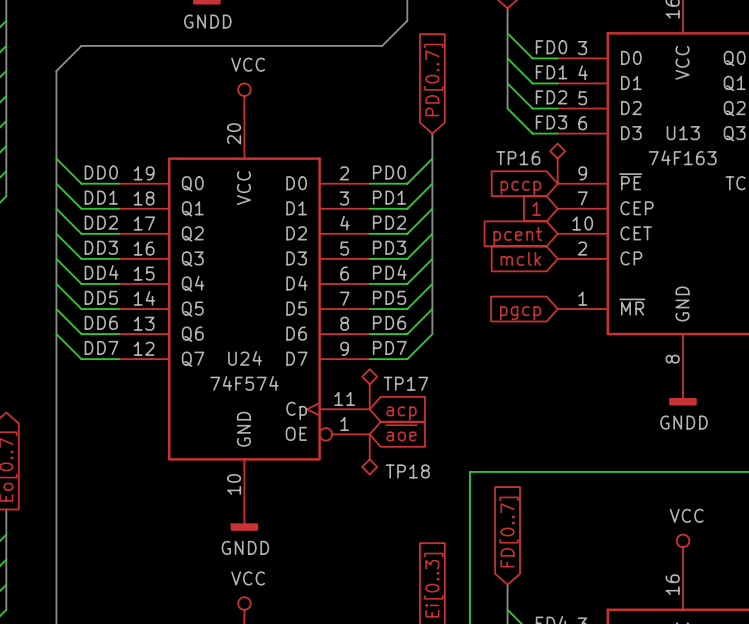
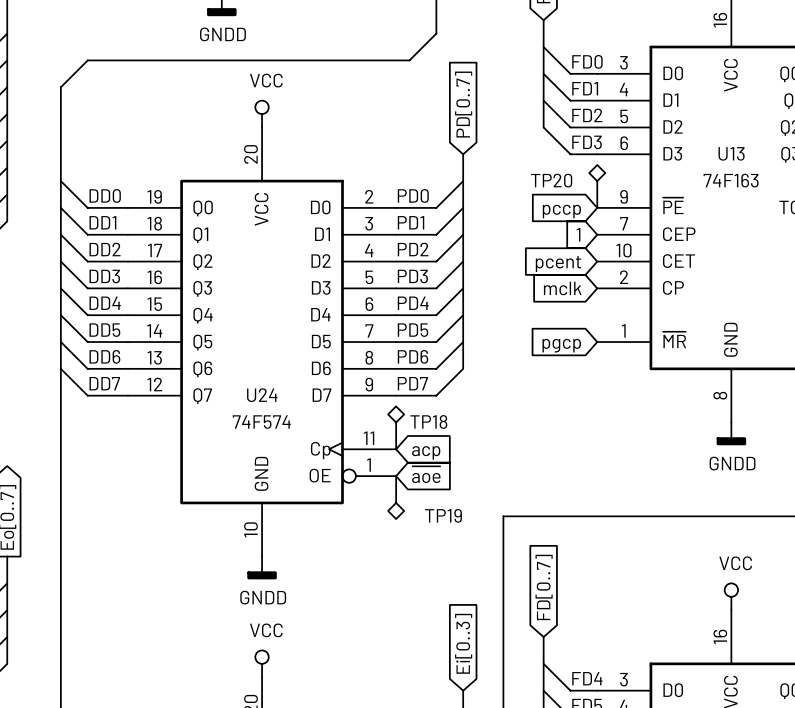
TP16 name: TP16 (518, 158) -> TP20 (551, 180)
TP17 name: TP17 (405, 383) -> TP18 (428, 421)
TP18 name: TP18 (407, 471) -> TP19 (443, 515)

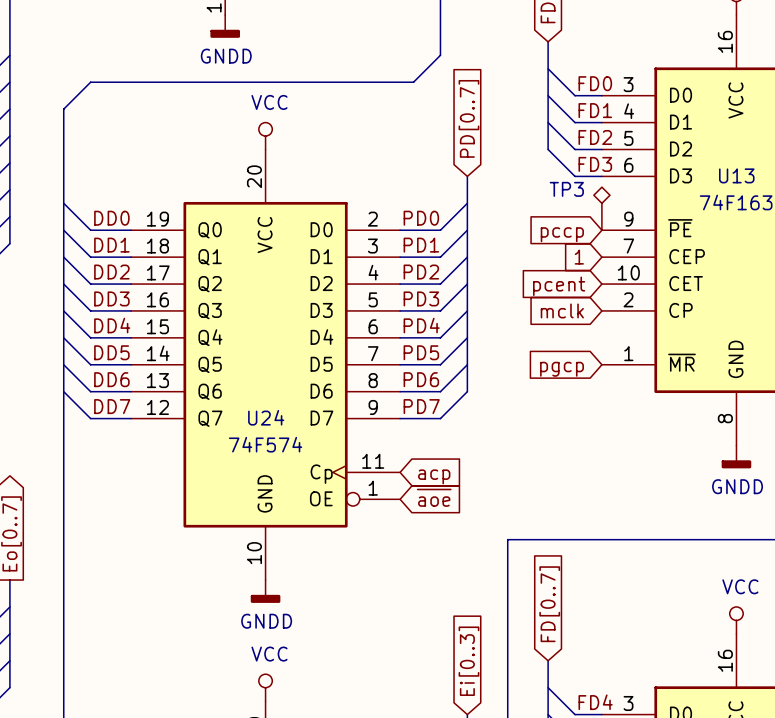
TP20 name: TP20 (551, 180) -> TP3 (566, 189)
TP18: (396, 427) -> none
TP19: (396, 497) -> none

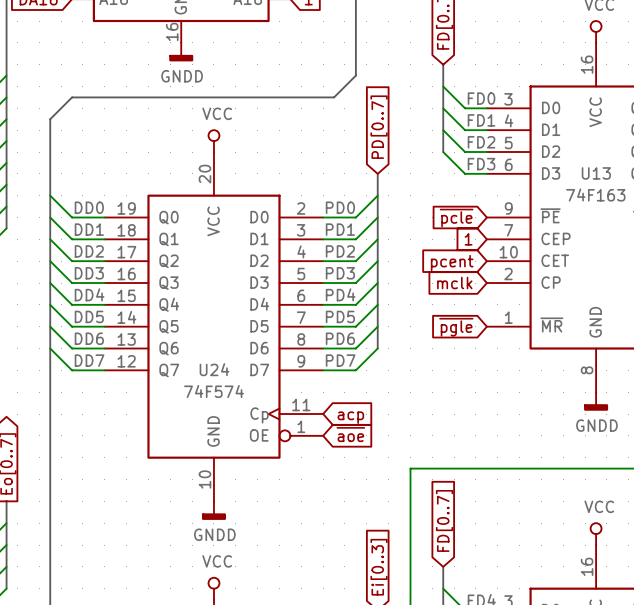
TP3: (601, 208) -> none
global label: pccp (562, 234) -> ~{pcle} (456, 218)
global label: pgcp (562, 369) -> ~{pgle} (456, 327)

